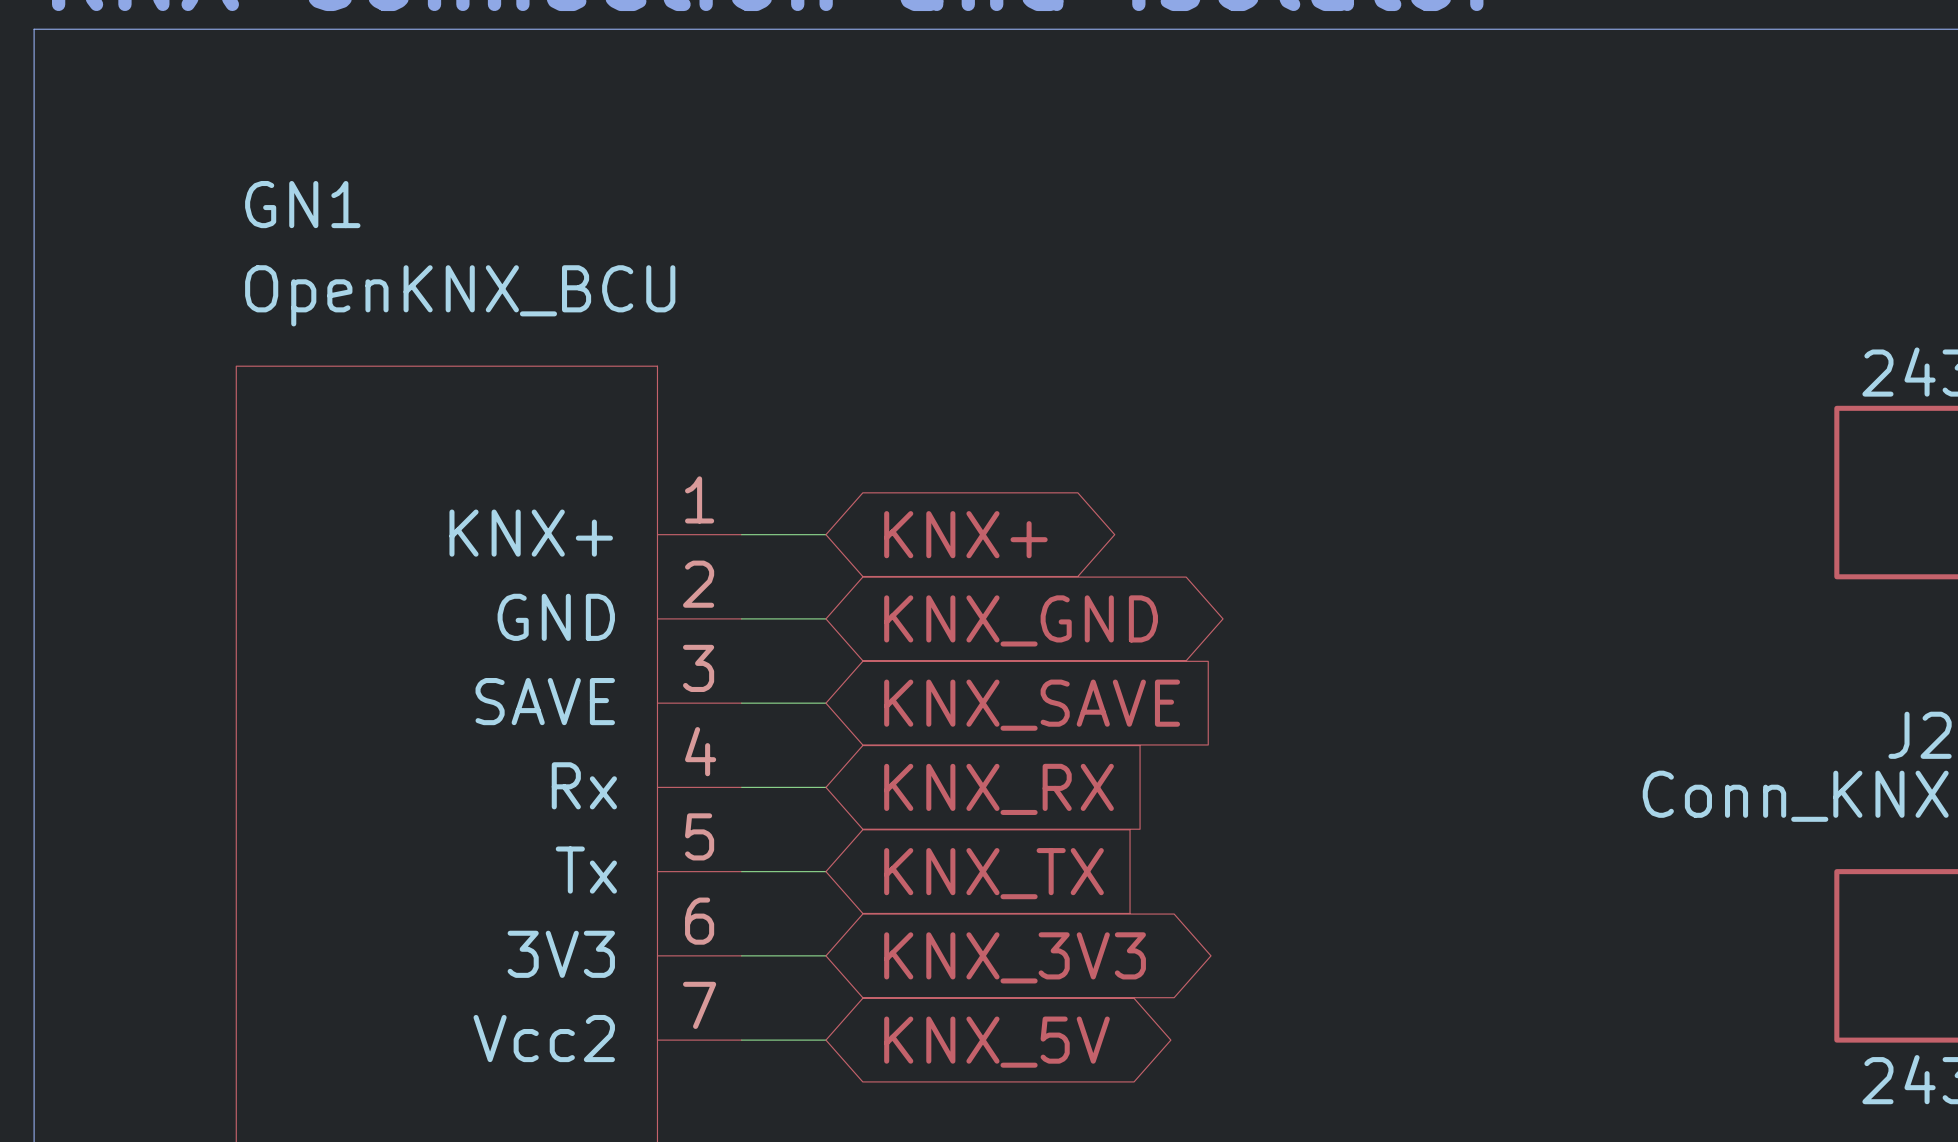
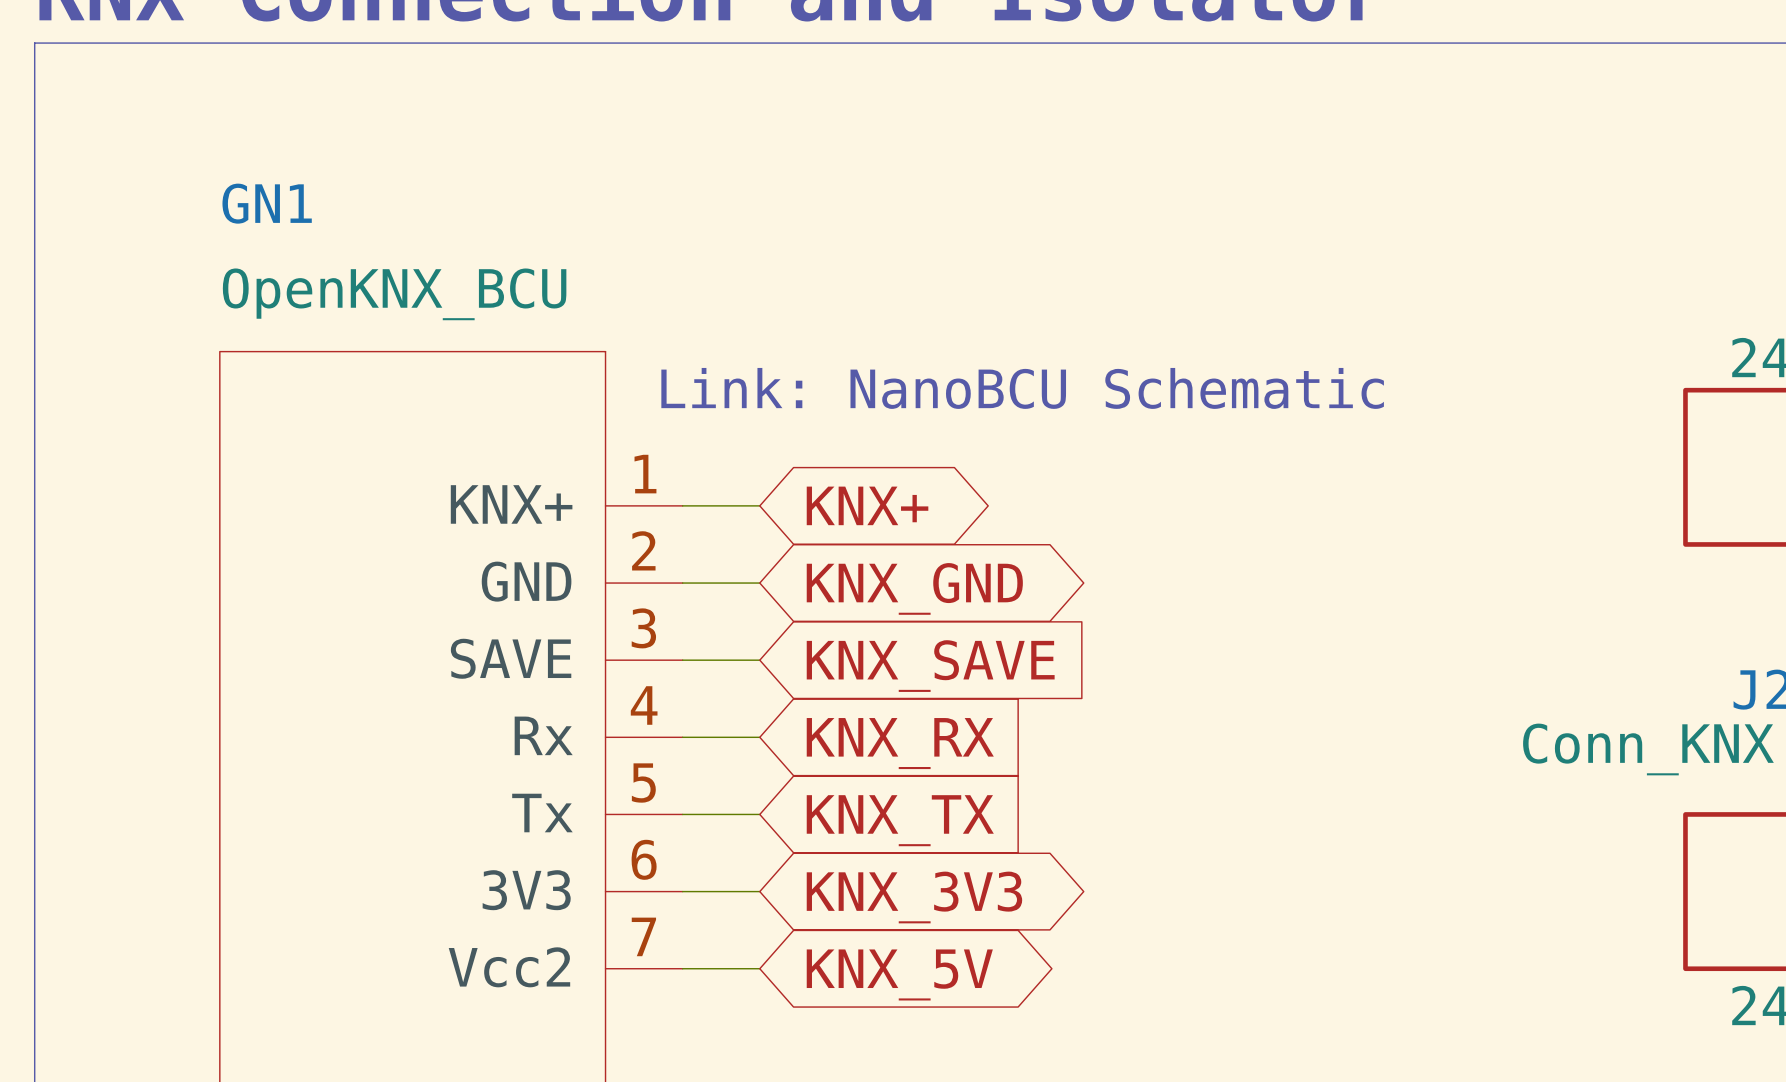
GN1 value position: OpenKNX_BCU (460, 295) -> OpenKNX_BCU (394, 294)
text: none -> Link: NanoBCU Schematic (1022, 388)

